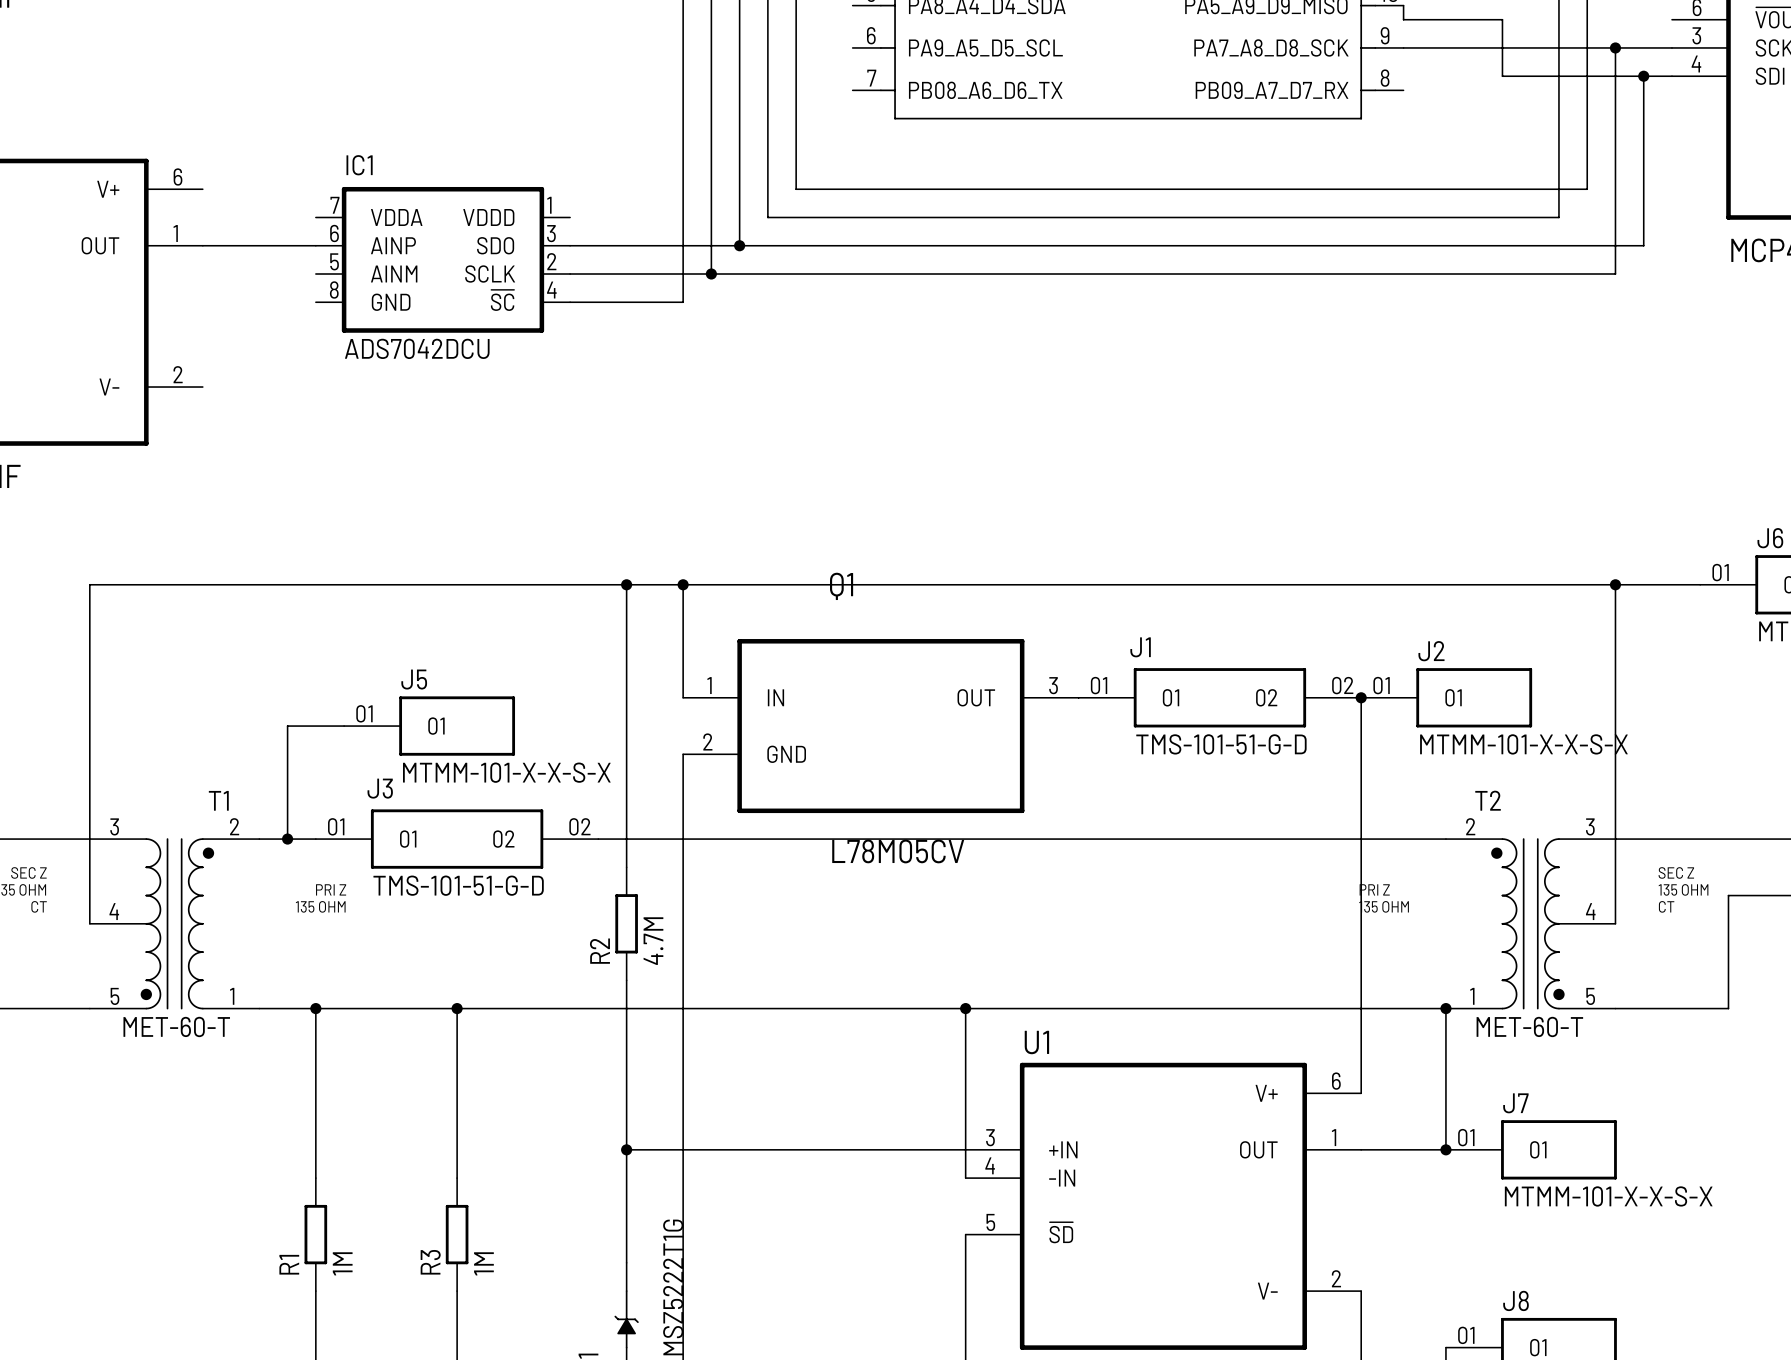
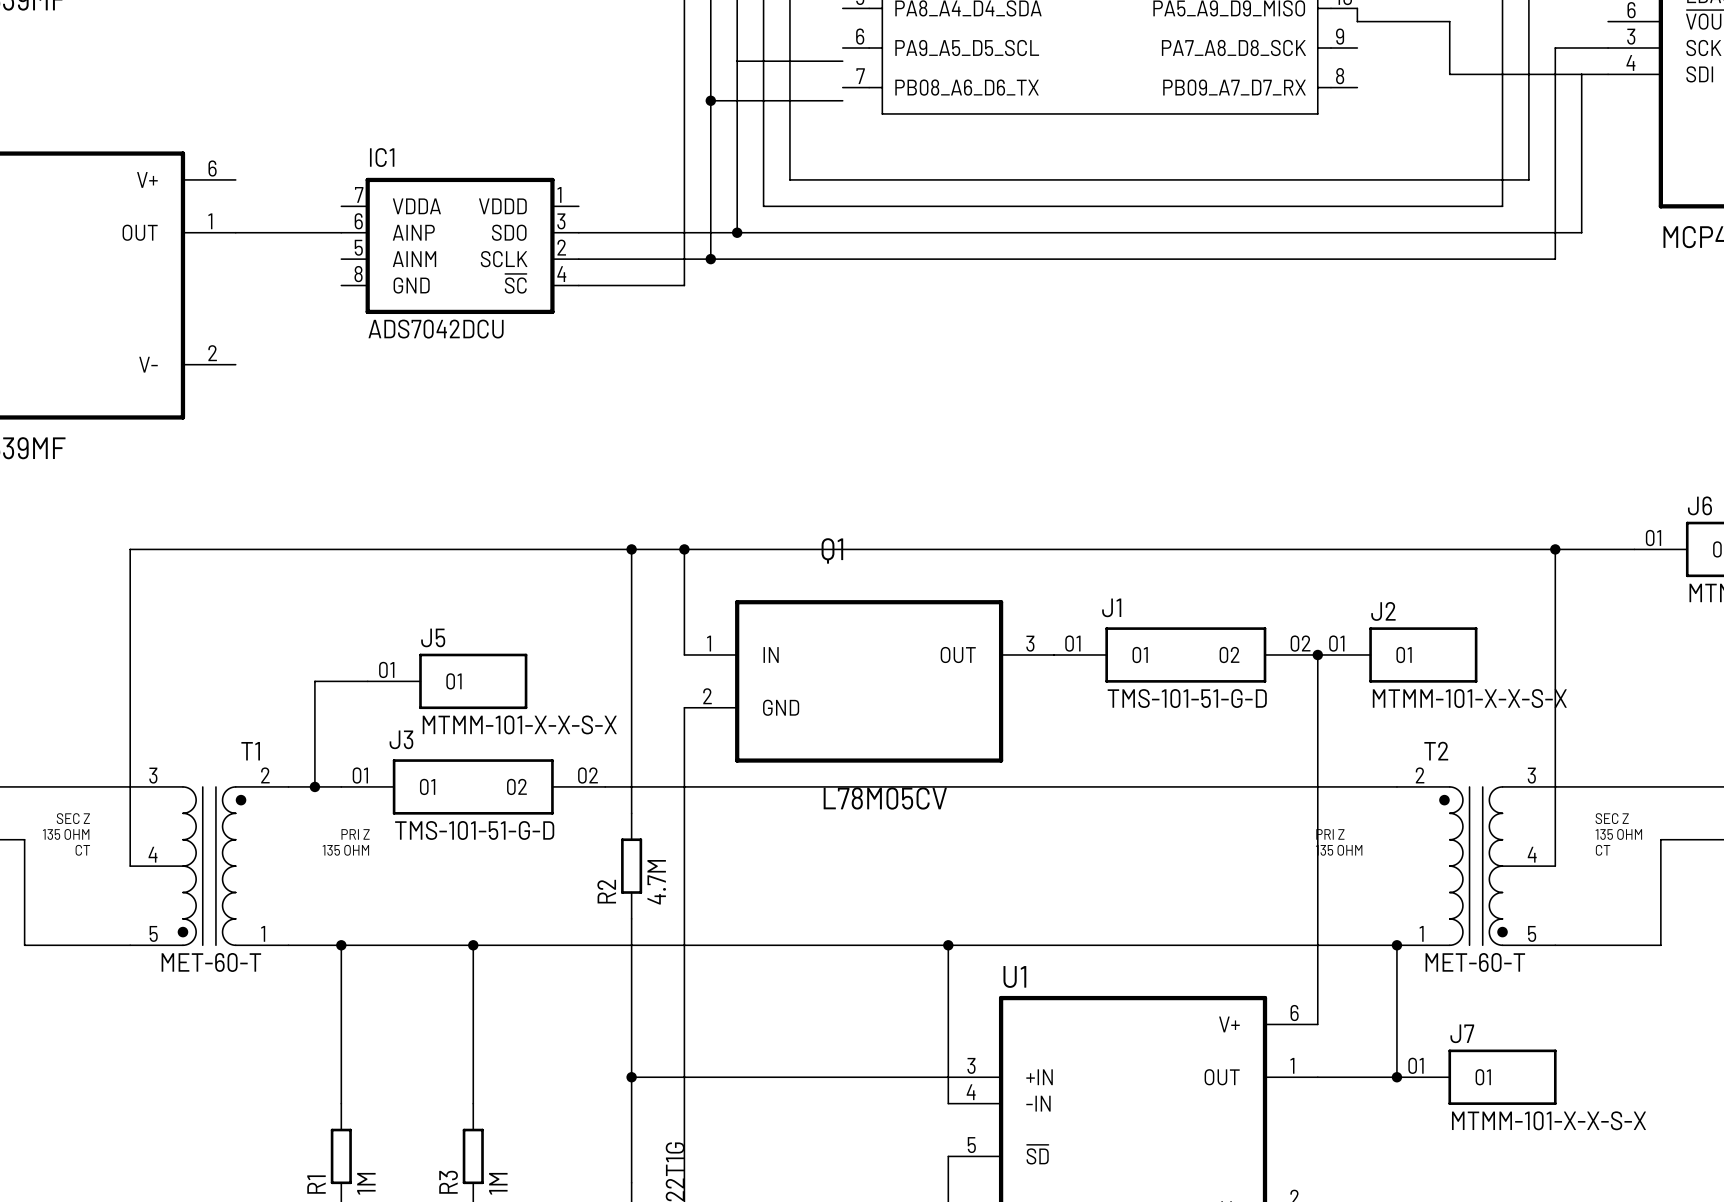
wire: (1403, 47) (1615, 47) -> none
junction: (1615, 47) -> none
wire: none -> (737, 61) (842, 61)
junction: (1643, 76) -> none
wire: none -> (710, 100) (842, 100)
junction: none -> (710, 100)

